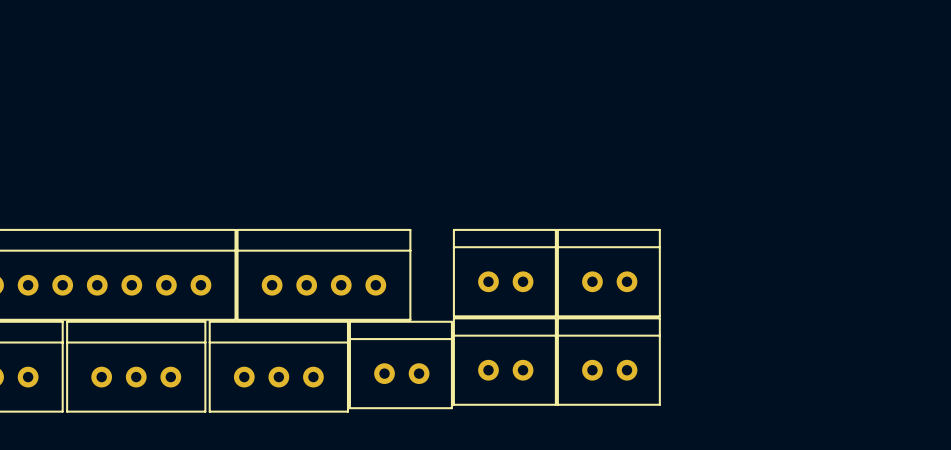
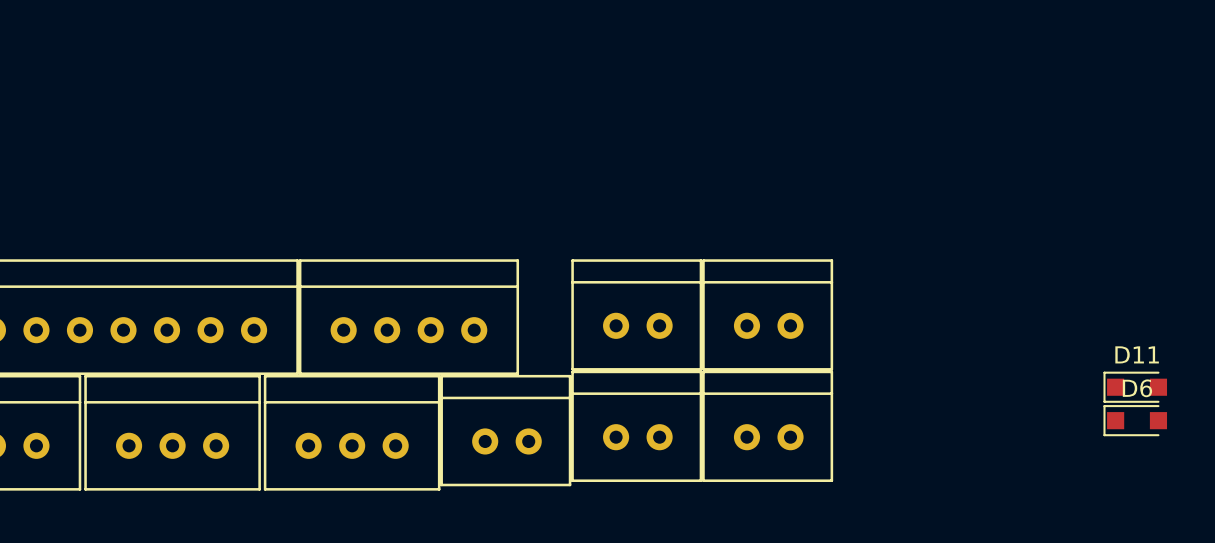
D11: none -> (1135, 387)
D6: none -> (1135, 420)

